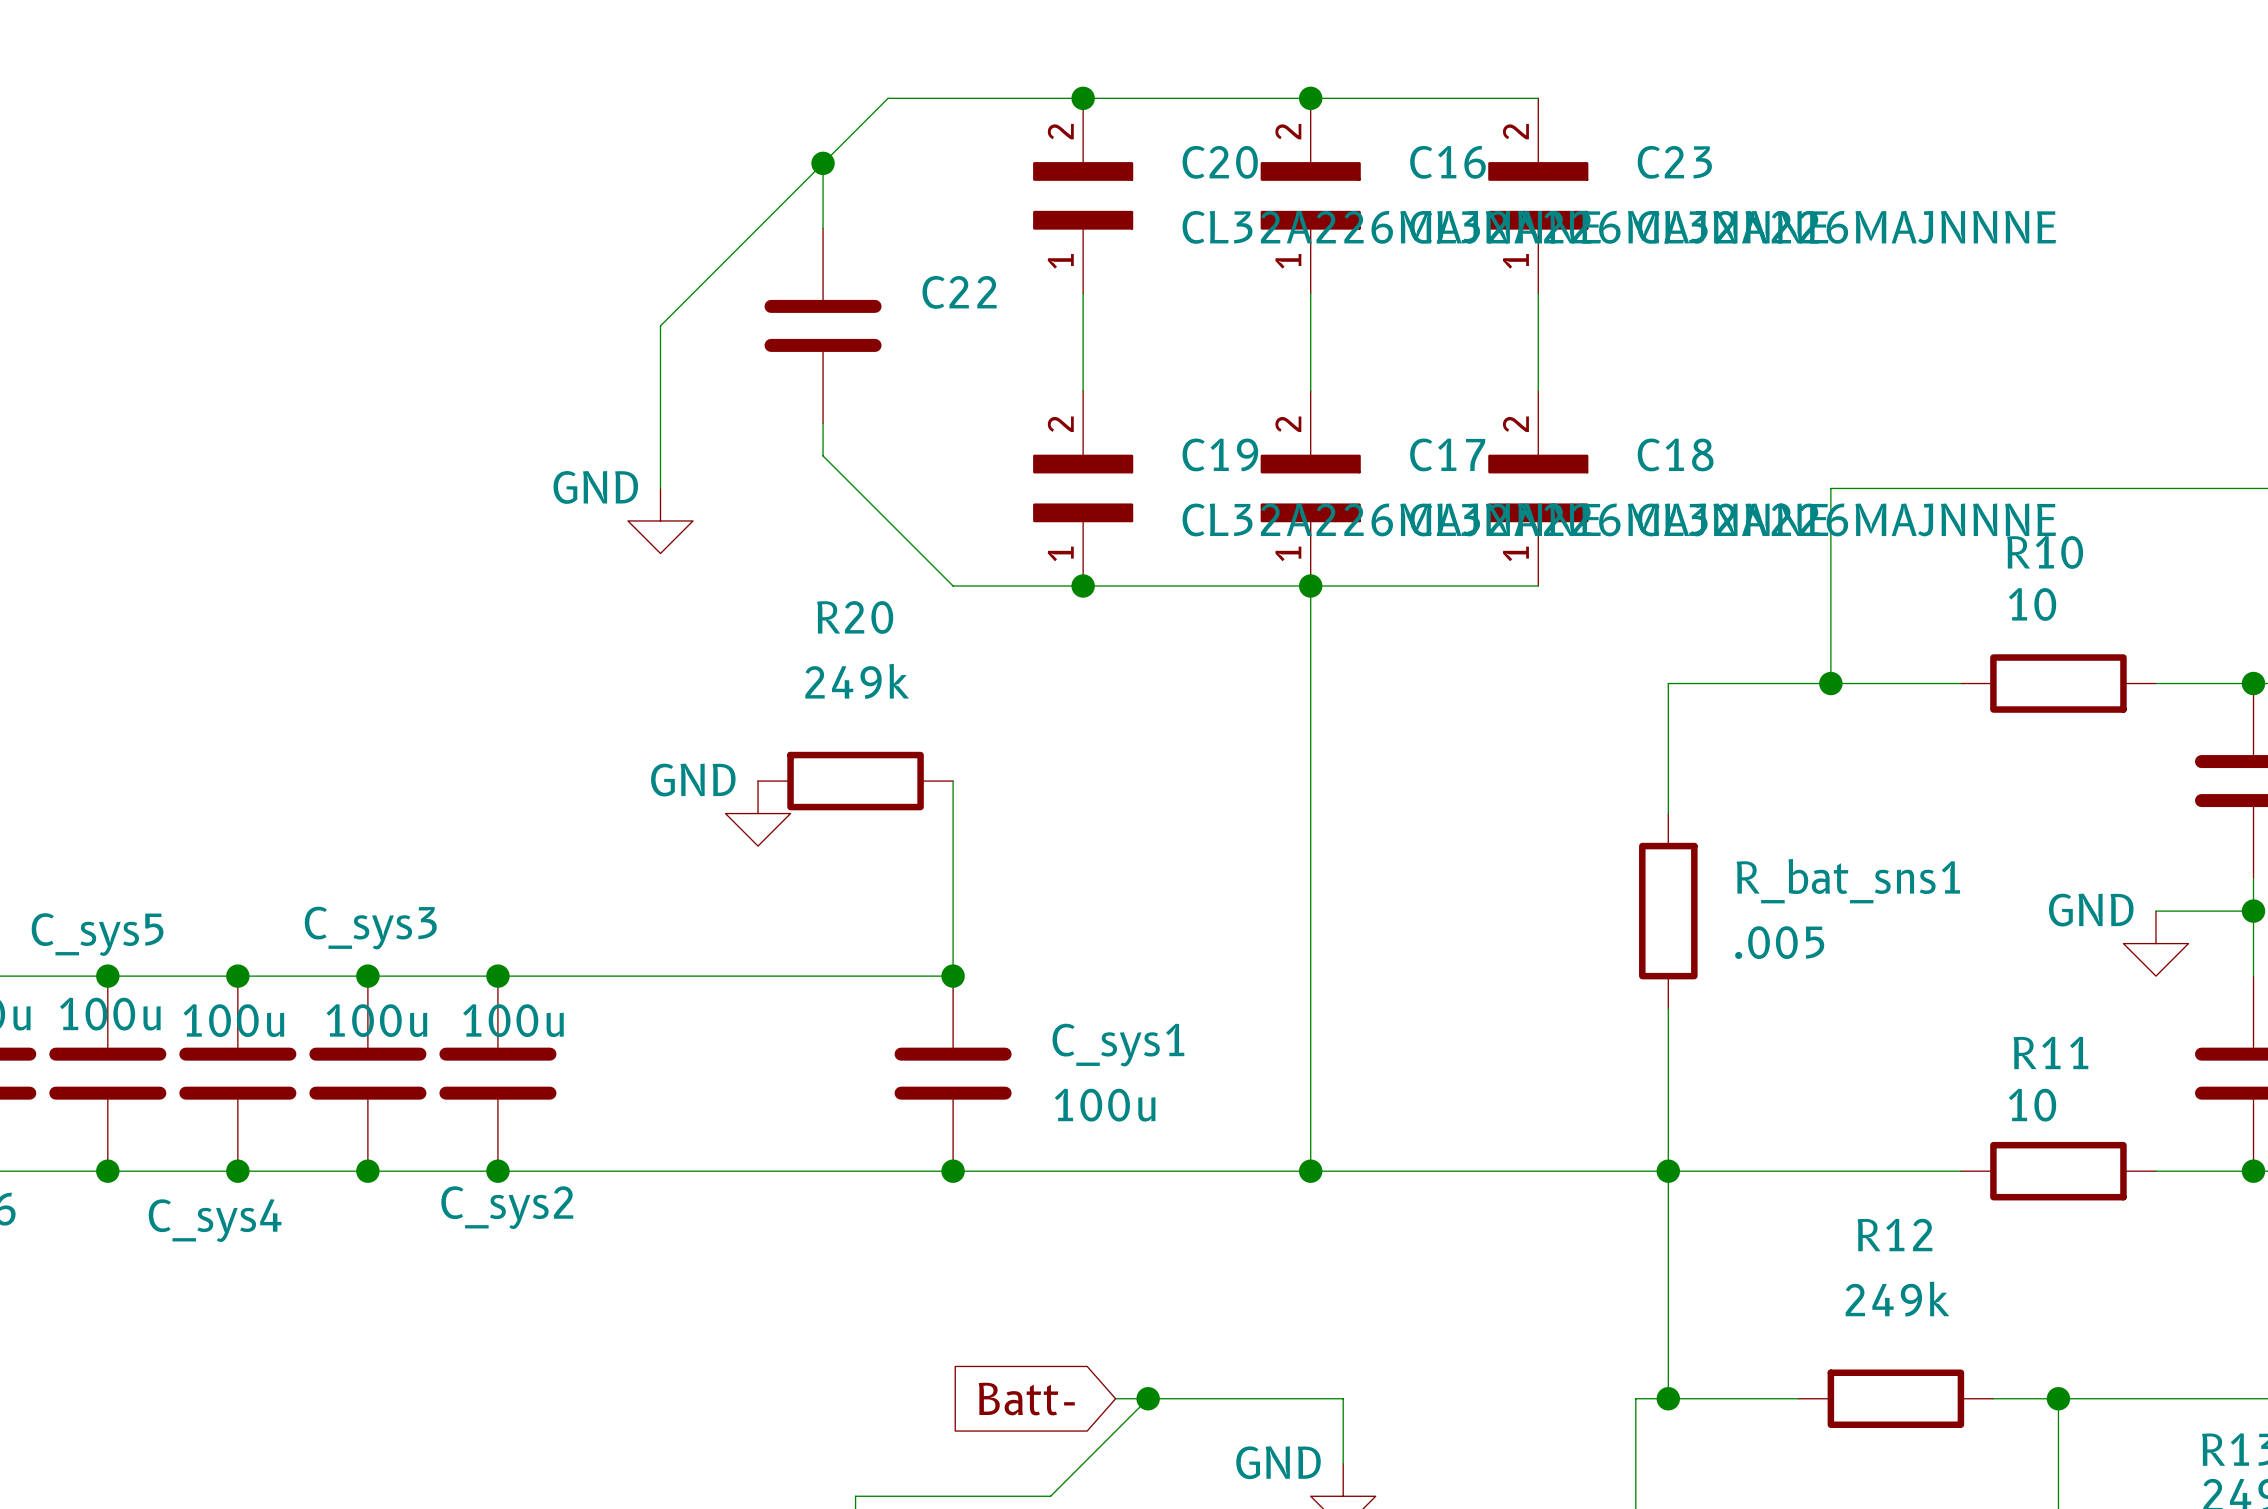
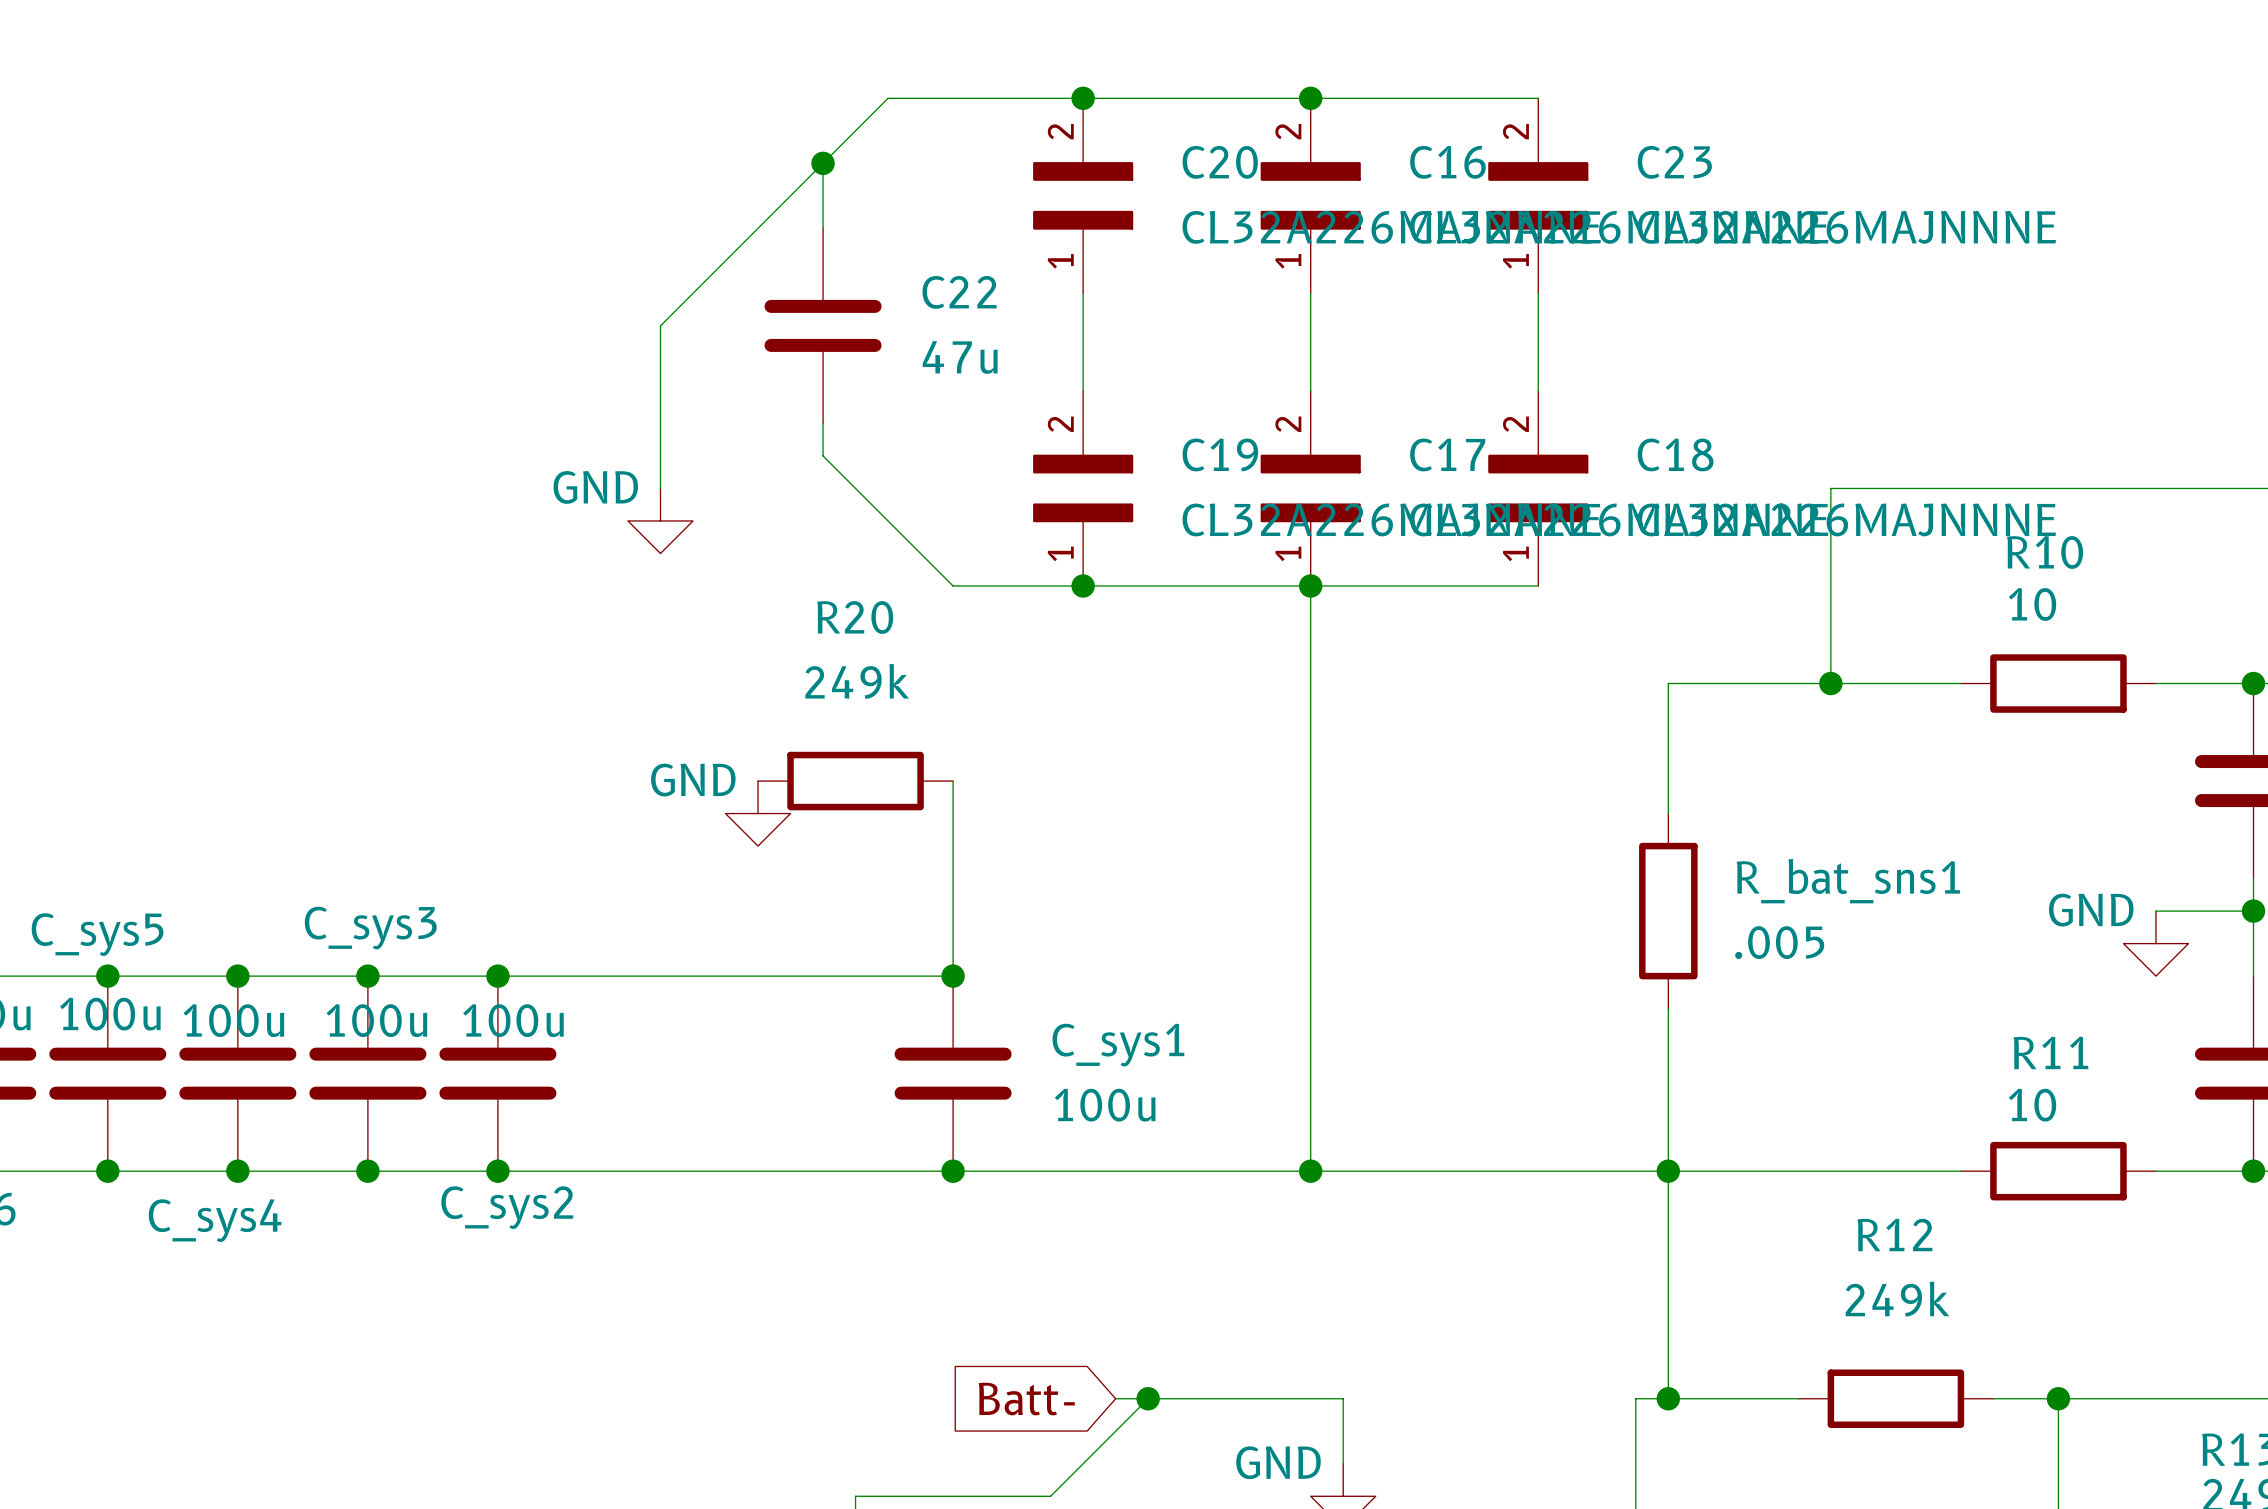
C22 value: none -> 47u (960, 357)

